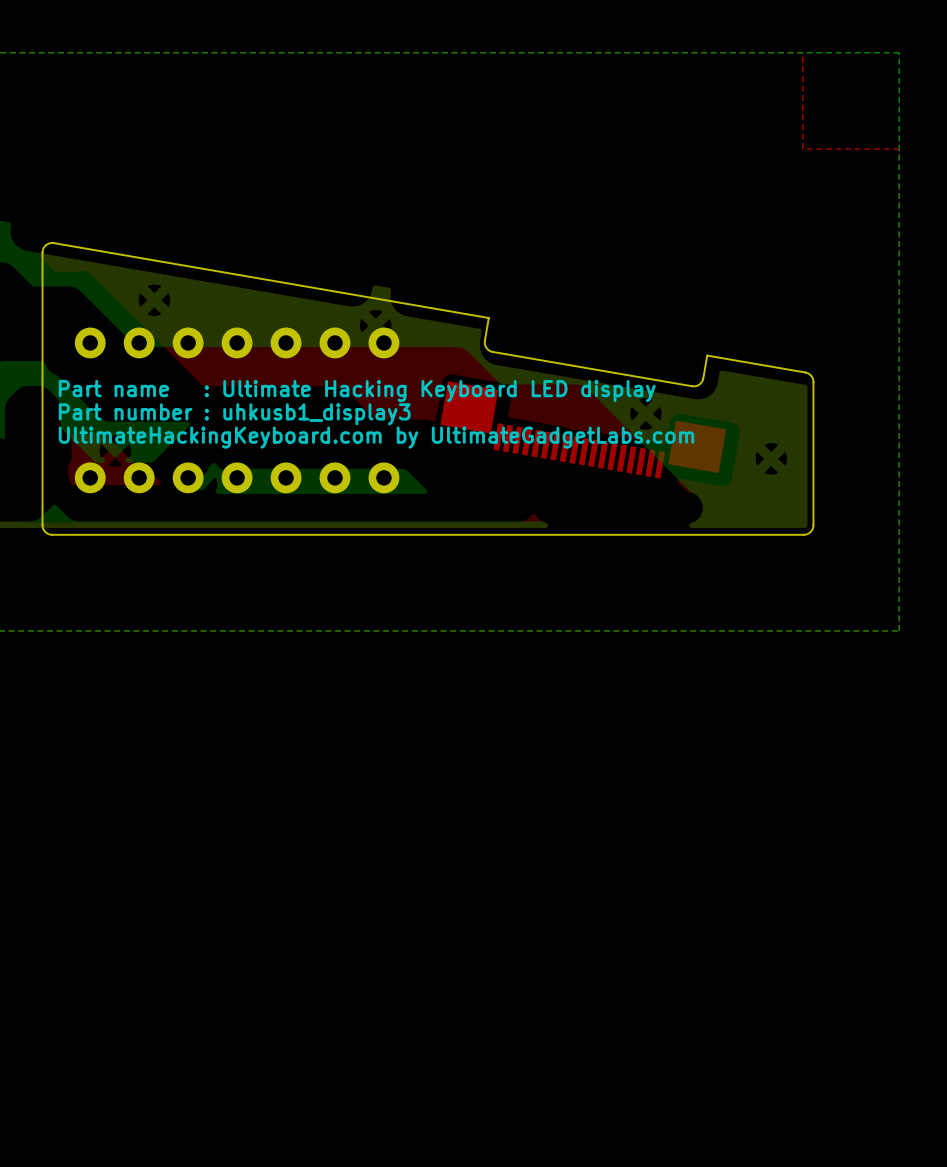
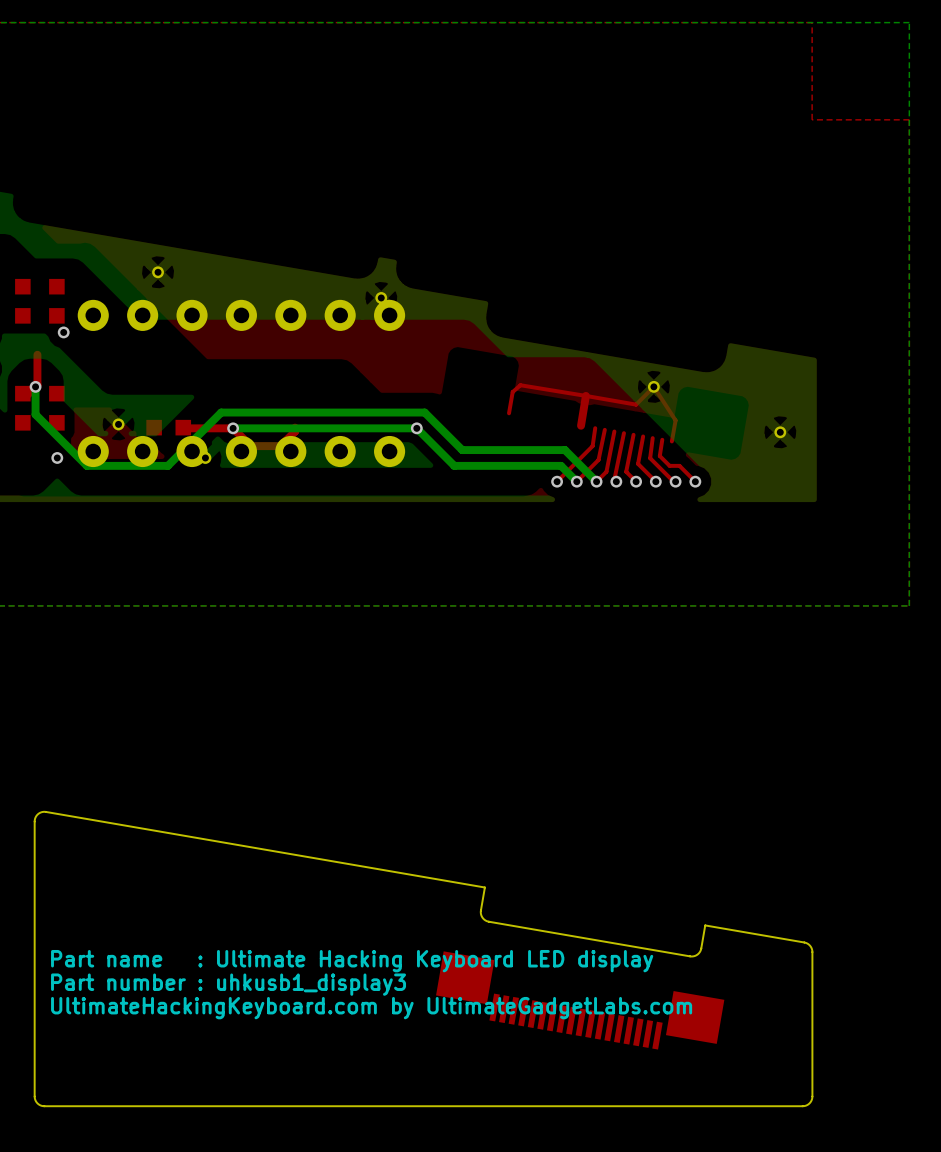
board edge: (53, 243) (488, 317) (484, 343) (487, 348) (492, 351) (693, 386) (699, 384) (702, 380) (707, 355) (807, 373) (811, 376) (813, 382) (812, 528) (809, 532) (803, 534) (48, 534) (44, 531) (42, 525) (42, 252) (45, 245) (53, 243) -> none
part: none -> (158, 272)
part: none -> (381, 297)
part: none -> (22, 301)
part: none -> (56, 301)
via: none -> (63, 332)
top track: none -> (37, 354) (37, 384) (27, 395)
text: Part name : Ultimate Hacking Keyboard LED display (357, 391) -> none
bottom track: none -> (35, 386) (35, 414) (86, 465) (167, 465) (221, 412) (424, 412) (462, 450) (564, 450) (596, 481)
via: none -> (35, 386)
part: none -> (653, 386)
text: Part number : uhkusb1_display3 (234, 414) -> none
top track: none -> (585, 395) (636, 404) (653, 386) (675, 420) (671, 441)
top track: none -> (585, 395) (520, 385) (512, 392) (509, 413)
top track: none -> (585, 395) (581, 425)
part: (583, 429) -> none
part: none -> (22, 408)
part: none -> (56, 408)
text: UltimateHackingKeyboard.com by UltimateGadgetLabs.com (376, 437) -> none
part: none -> (118, 424)
part: none -> (168, 427)
bottom track: none -> (233, 428) (416, 428) (454, 465) (561, 465) (576, 481)
via: none -> (233, 428)
top track: none -> (295, 427) (295, 431) (280, 446) (250, 446) (233, 428) (183, 428)
via: none -> (416, 428)
top track: none -> (595, 428) (592, 446) (557, 481)
top track: none -> (604, 429) (598, 459) (576, 481)
top track: none -> (614, 431) (606, 471) (596, 481)
part: none -> (780, 432)
top track: none -> (623, 433) (614, 479) (616, 481)
top track: none -> (633, 434) (626, 471) (636, 481)
top track: none -> (643, 436) (638, 463) (655, 481)
top track: none -> (652, 438) (650, 458) (675, 481)
top track: none -> (662, 439) (659, 456) (669, 465) (679, 465) (695, 481)
via: none -> (57, 457)
part: none -> (205, 457)
via: none -> (557, 481)
via: none -> (576, 481)
via: none -> (596, 481)
via: none -> (616, 481)
via: none -> (636, 481)
via: none -> (655, 481)
via: none -> (675, 481)
via: none -> (695, 481)
board edge: none -> (46, 811) (484, 887) (480, 913) (483, 918) (488, 921) (691, 956) (696, 955) (700, 950) (705, 925) (806, 943) (810, 946) (812, 952) (811, 1100) (808, 1104) (802, 1106) (40, 1105) (36, 1102) (34, 1096) (34, 821) (38, 814) (46, 811)
text: none -> Part name : Ultimate Hacking Keyboard LED display (352, 961)
text: none -> Part number : uhkusb1_display3 (228, 984)
part: none -> (580, 1000)
text: none -> UltimateHackingKeyboard.com by UltimateGadgetLabs.com (371, 1008)

